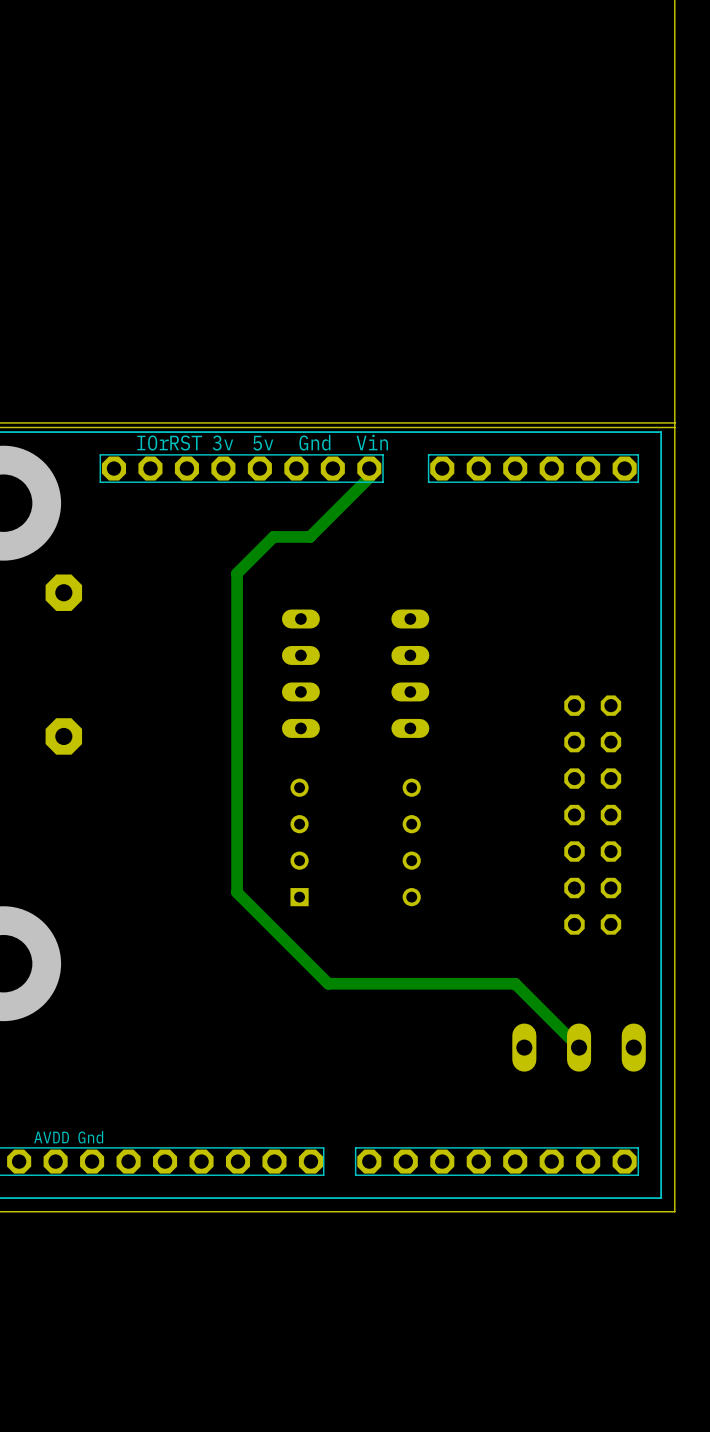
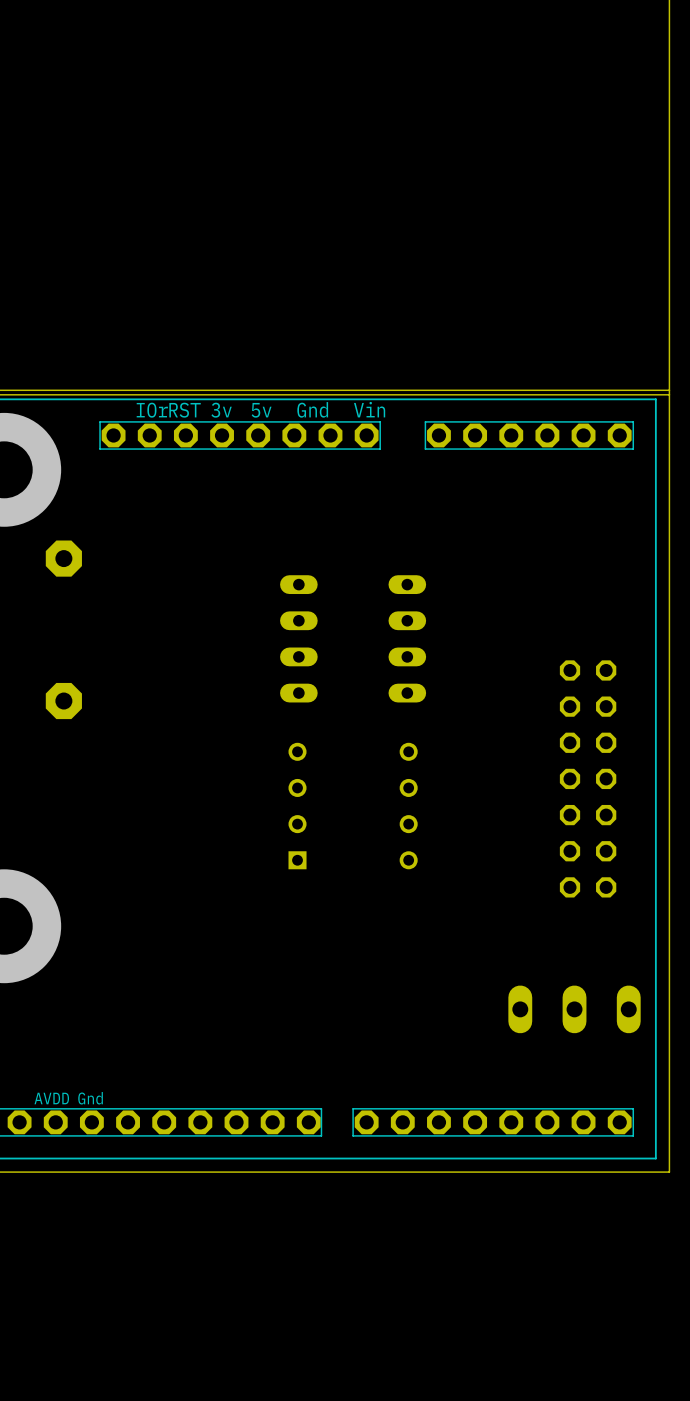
track: (369, 468) (369, 477) (310, 536) (273, 536) (237, 573) (237, 892) (328, 983) (515, 983) (579, 1047) -> none

